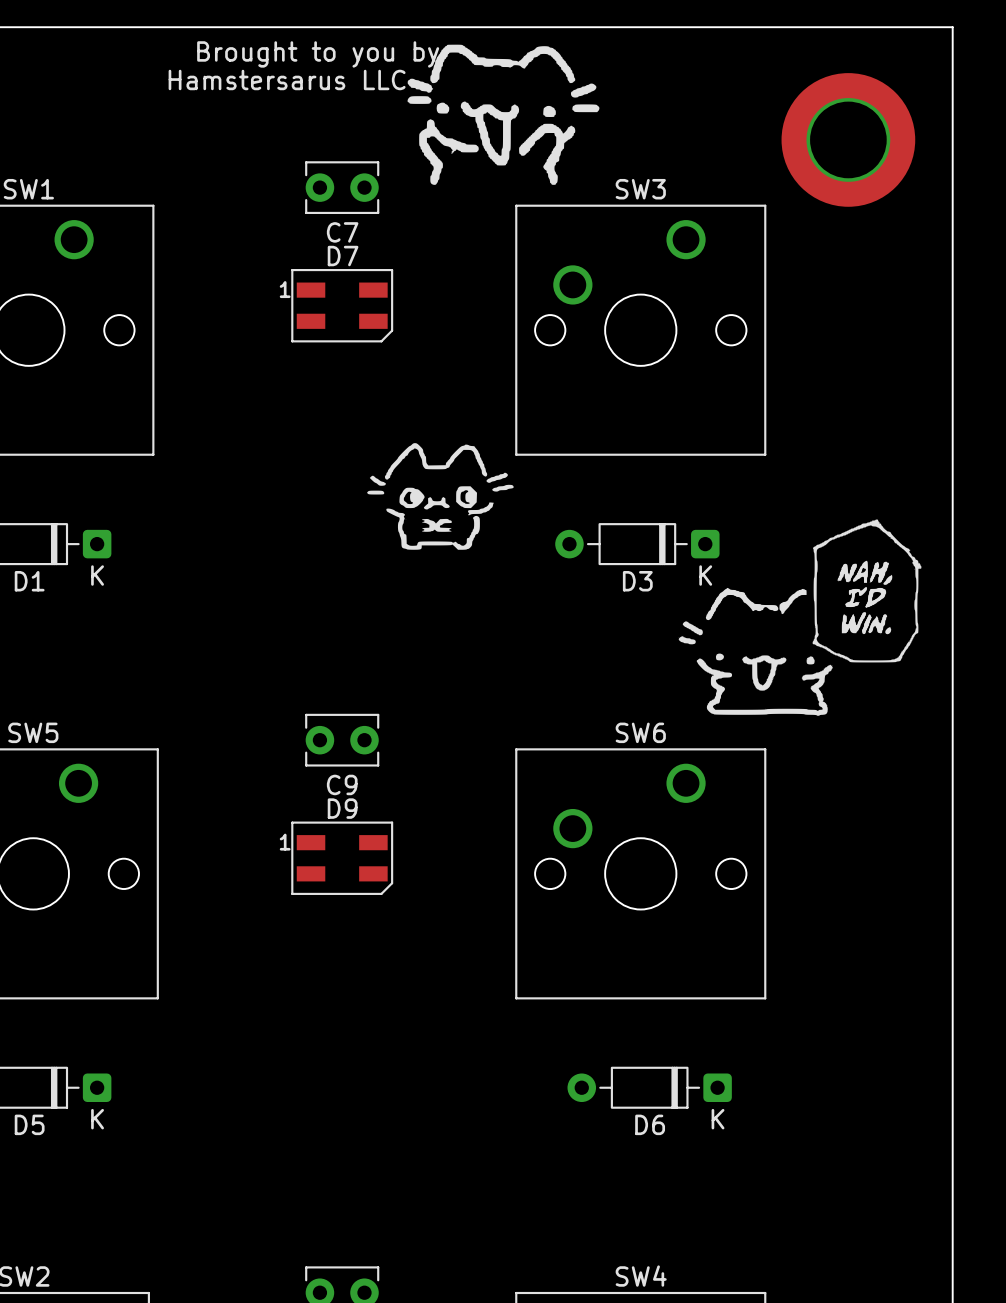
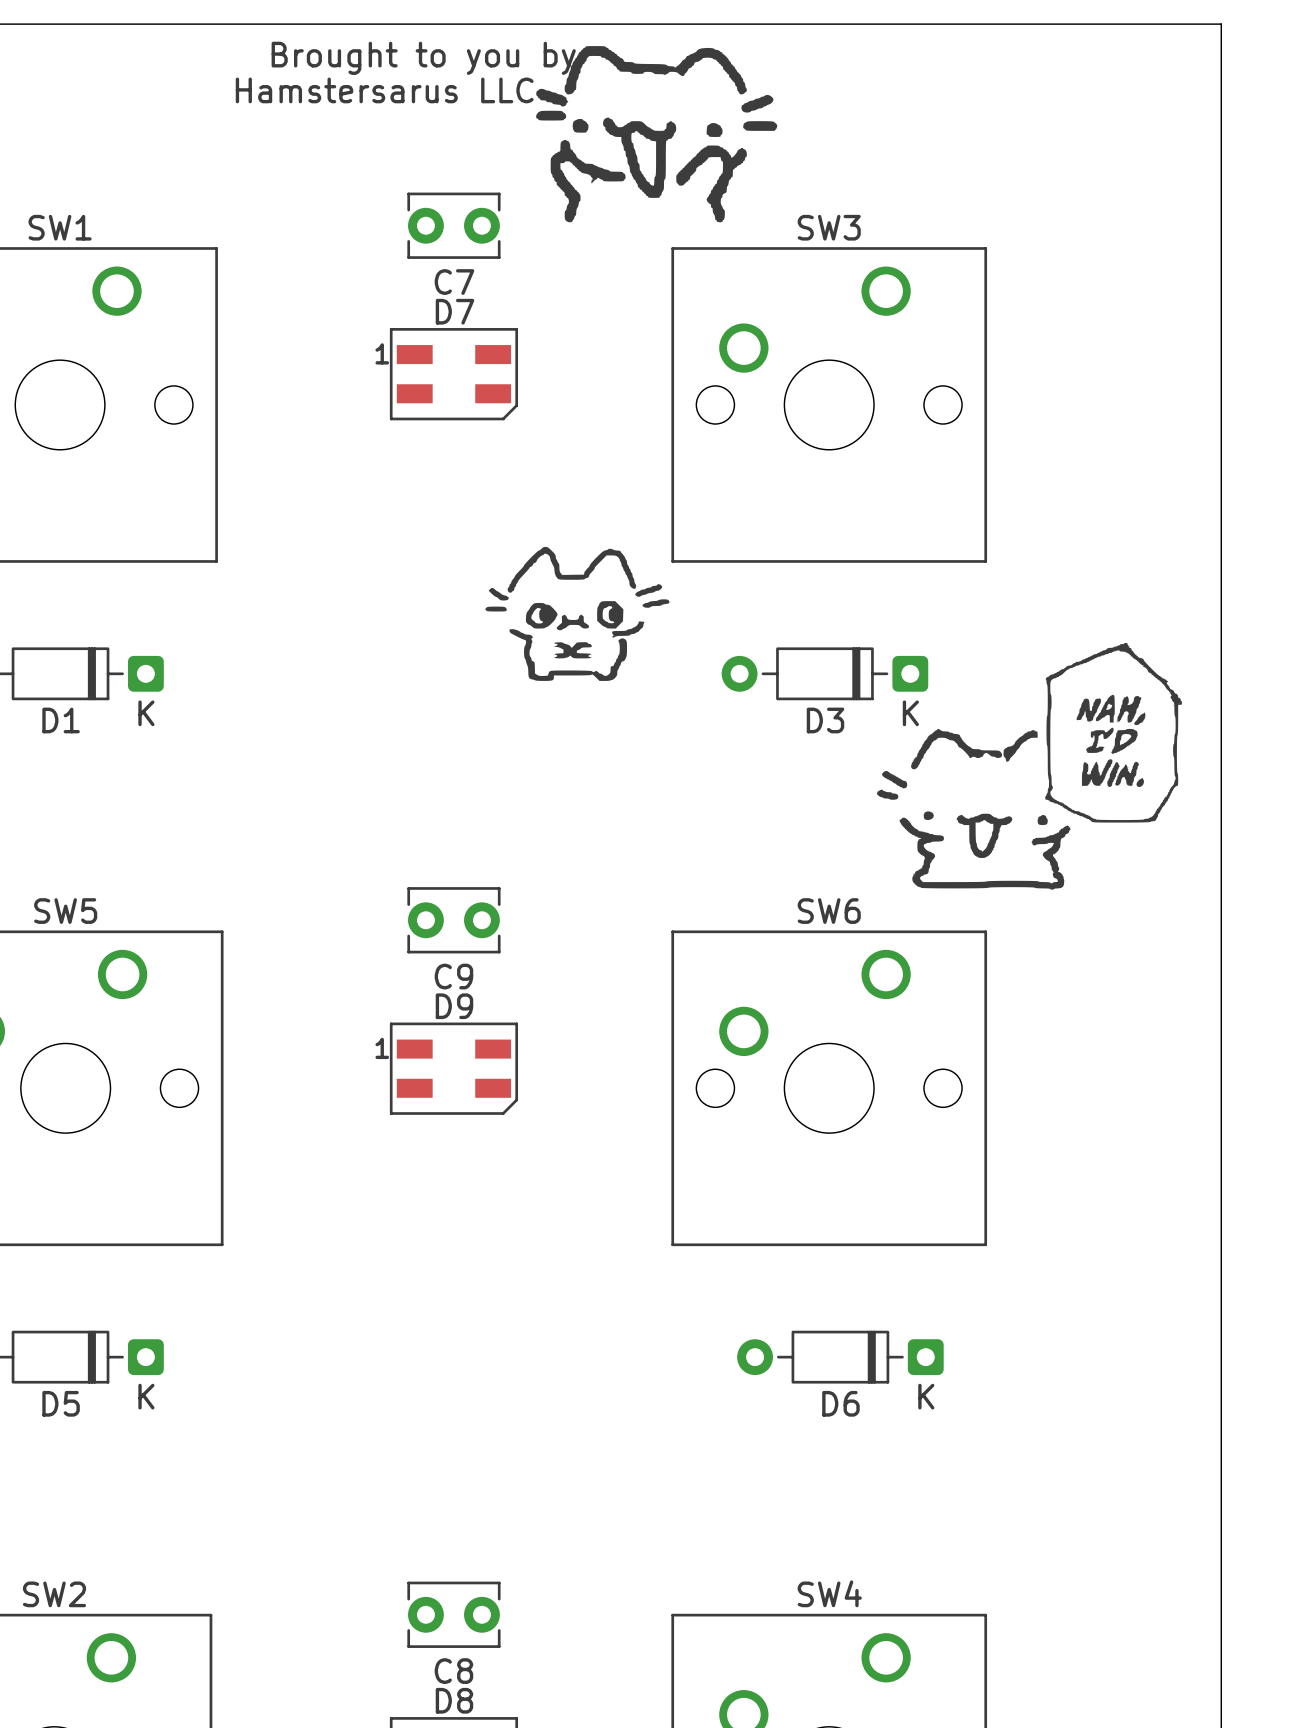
part: (848, 139) -> none

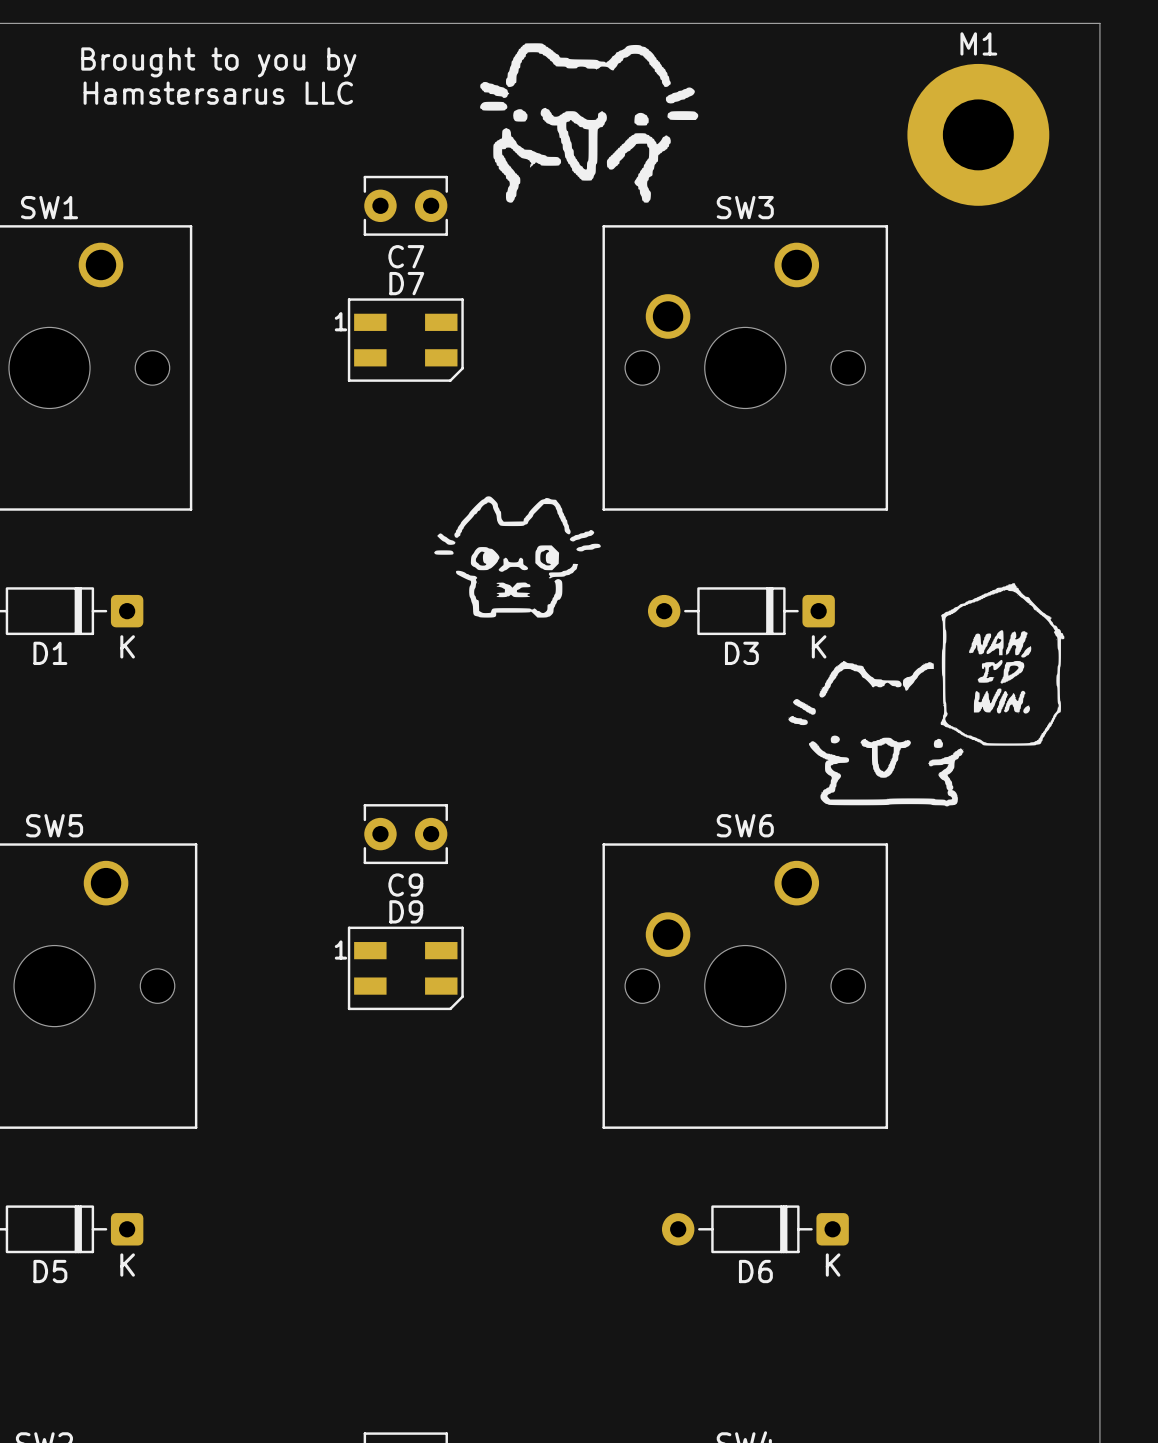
text position: Brought to you by (423, 58) -> Brought to you by (218, 62)
text position: Hamstersarus LLC (384, 90) -> Hamstersarus LLC (218, 93)
M1: none -> (978, 134)

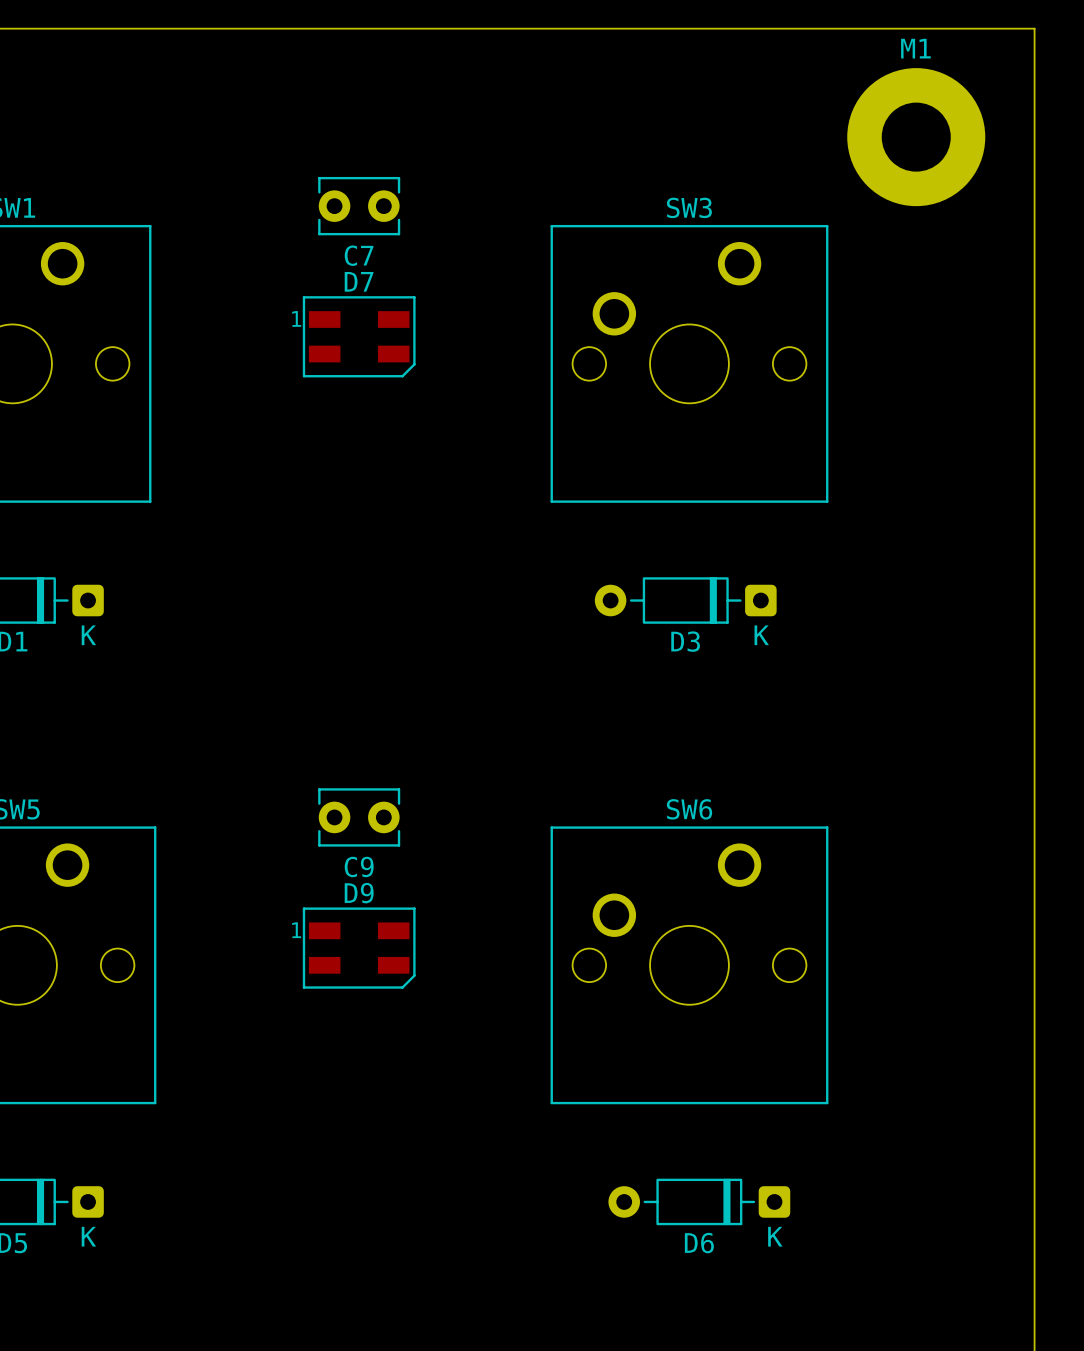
drawing: [480, 43, 699, 203] -> none
text: Brought to you by (218, 62) -> none
text: Hamstersarus LLC (218, 93) -> none
drawing: [434, 496, 601, 618] -> none
drawing: [788, 583, 1065, 807] -> none

